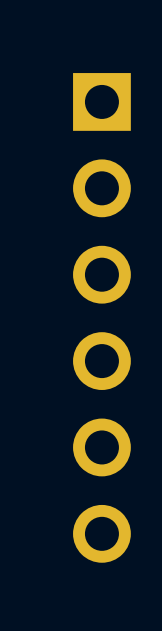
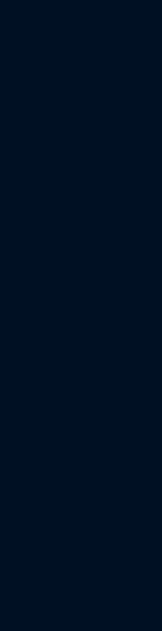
part: (101, 317) -> none

